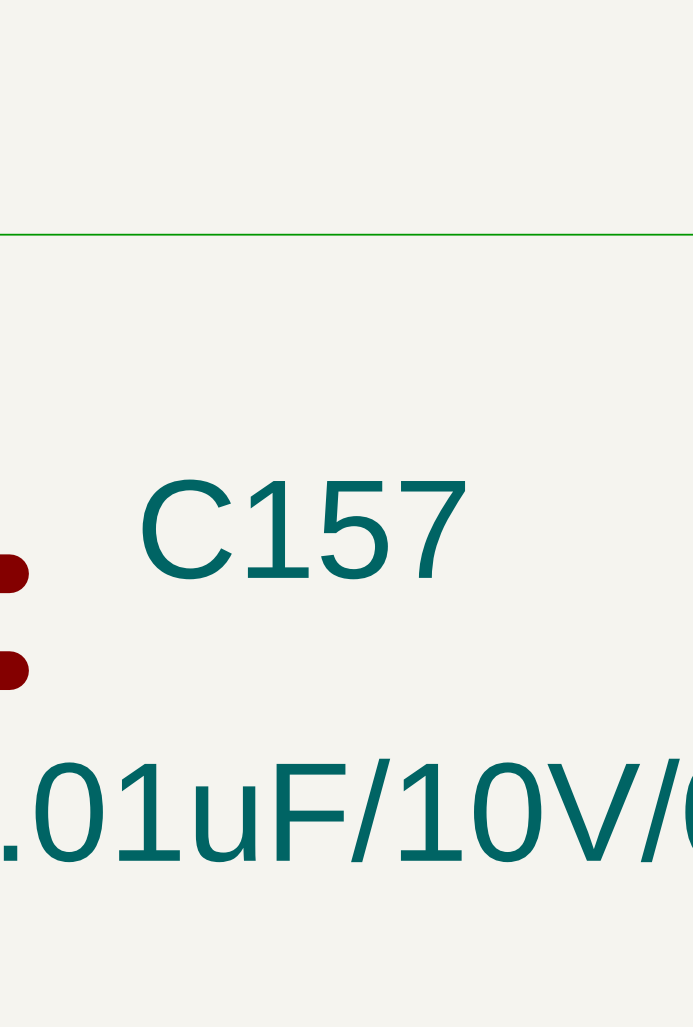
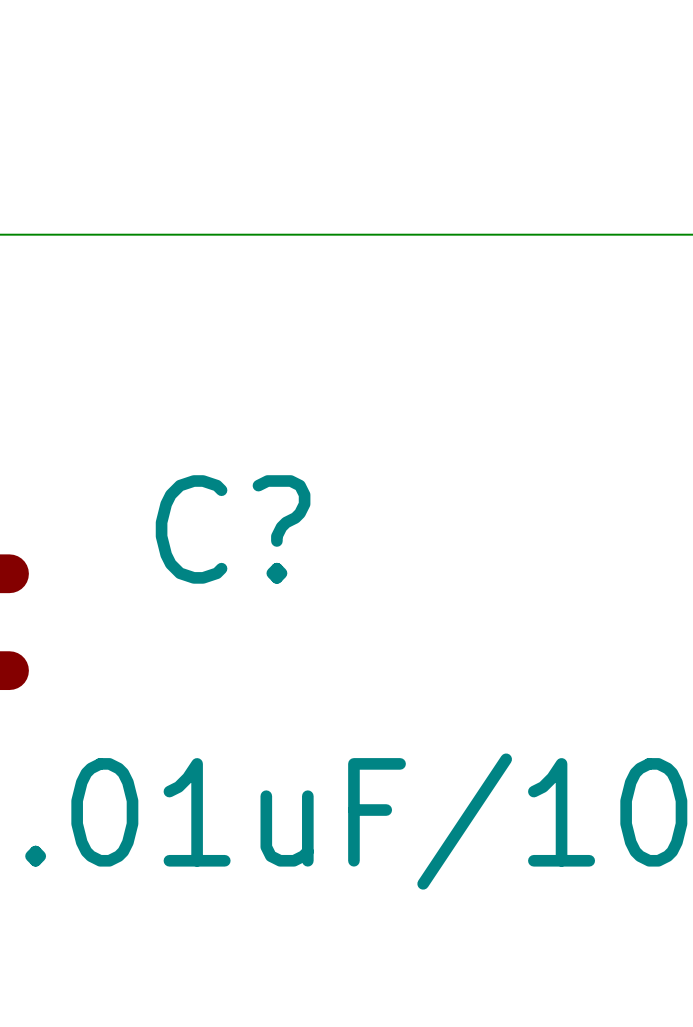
C157 name: C157 (303, 529) -> C? (233, 529)

